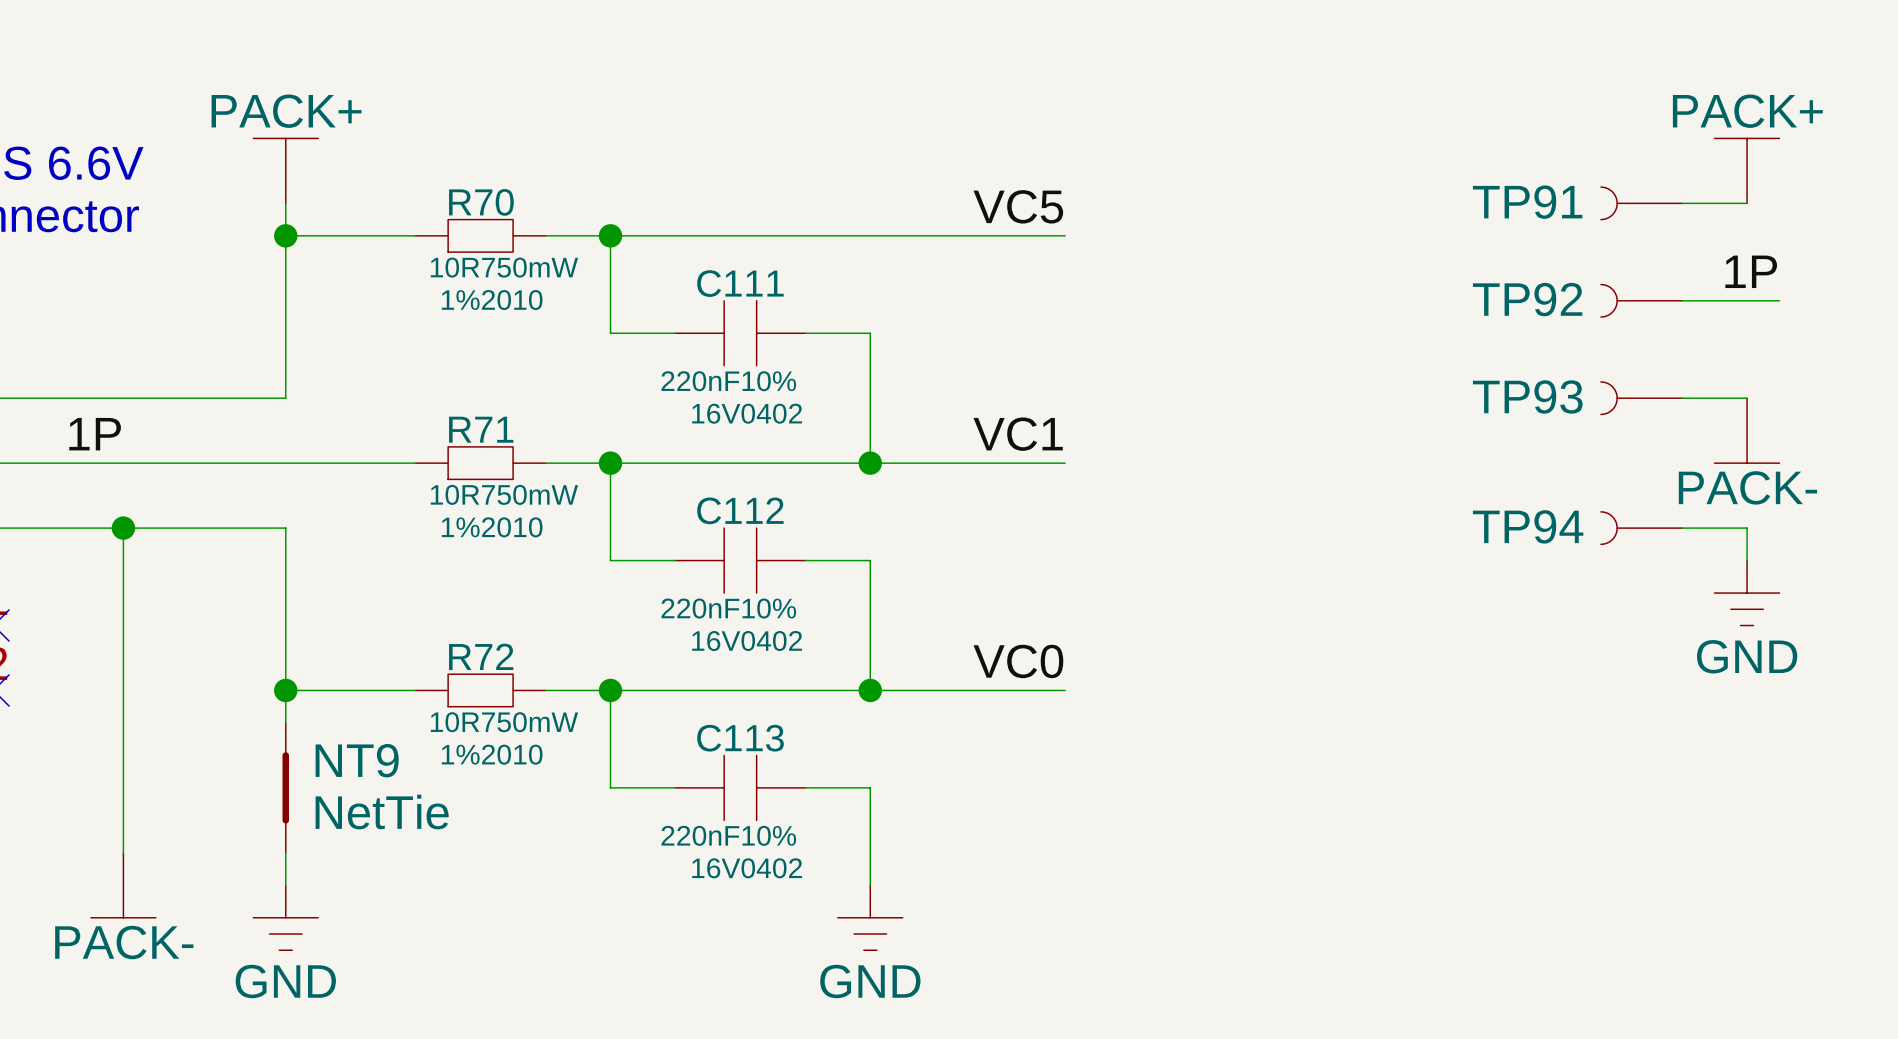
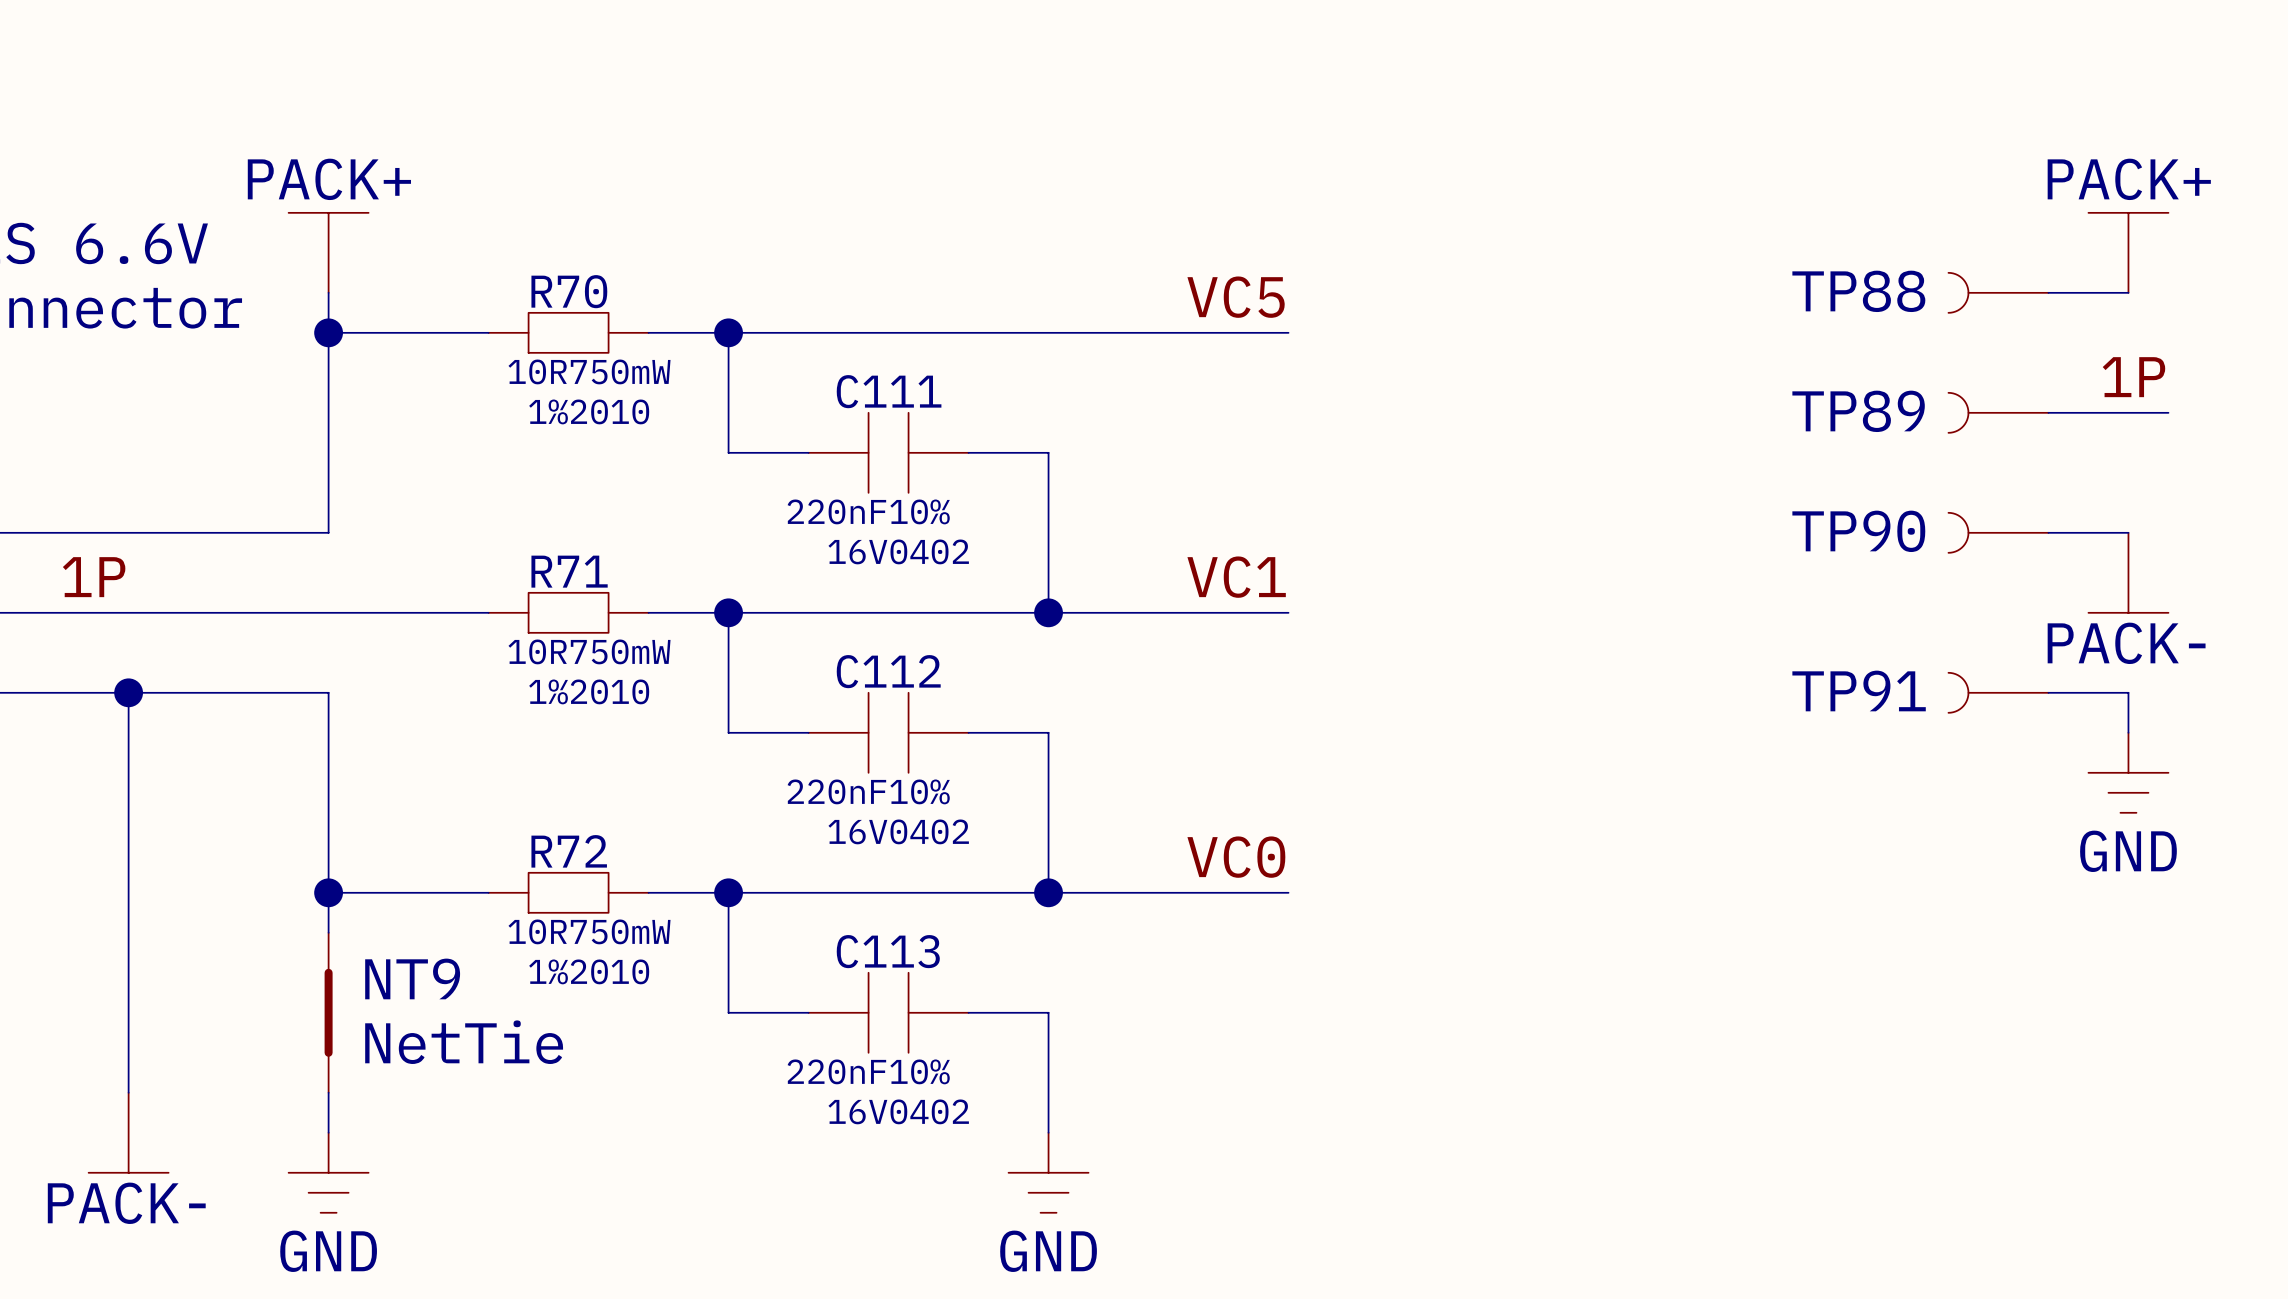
TP91 name: TP91 (1527, 202) -> TP88 (1858, 291)
TP92 name: TP92 (1527, 299) -> TP89 (1858, 411)
TP93 name: TP93 (1527, 396) -> TP90 (1858, 531)
TP94 name: TP94 (1528, 526) -> TP91 (1859, 690)

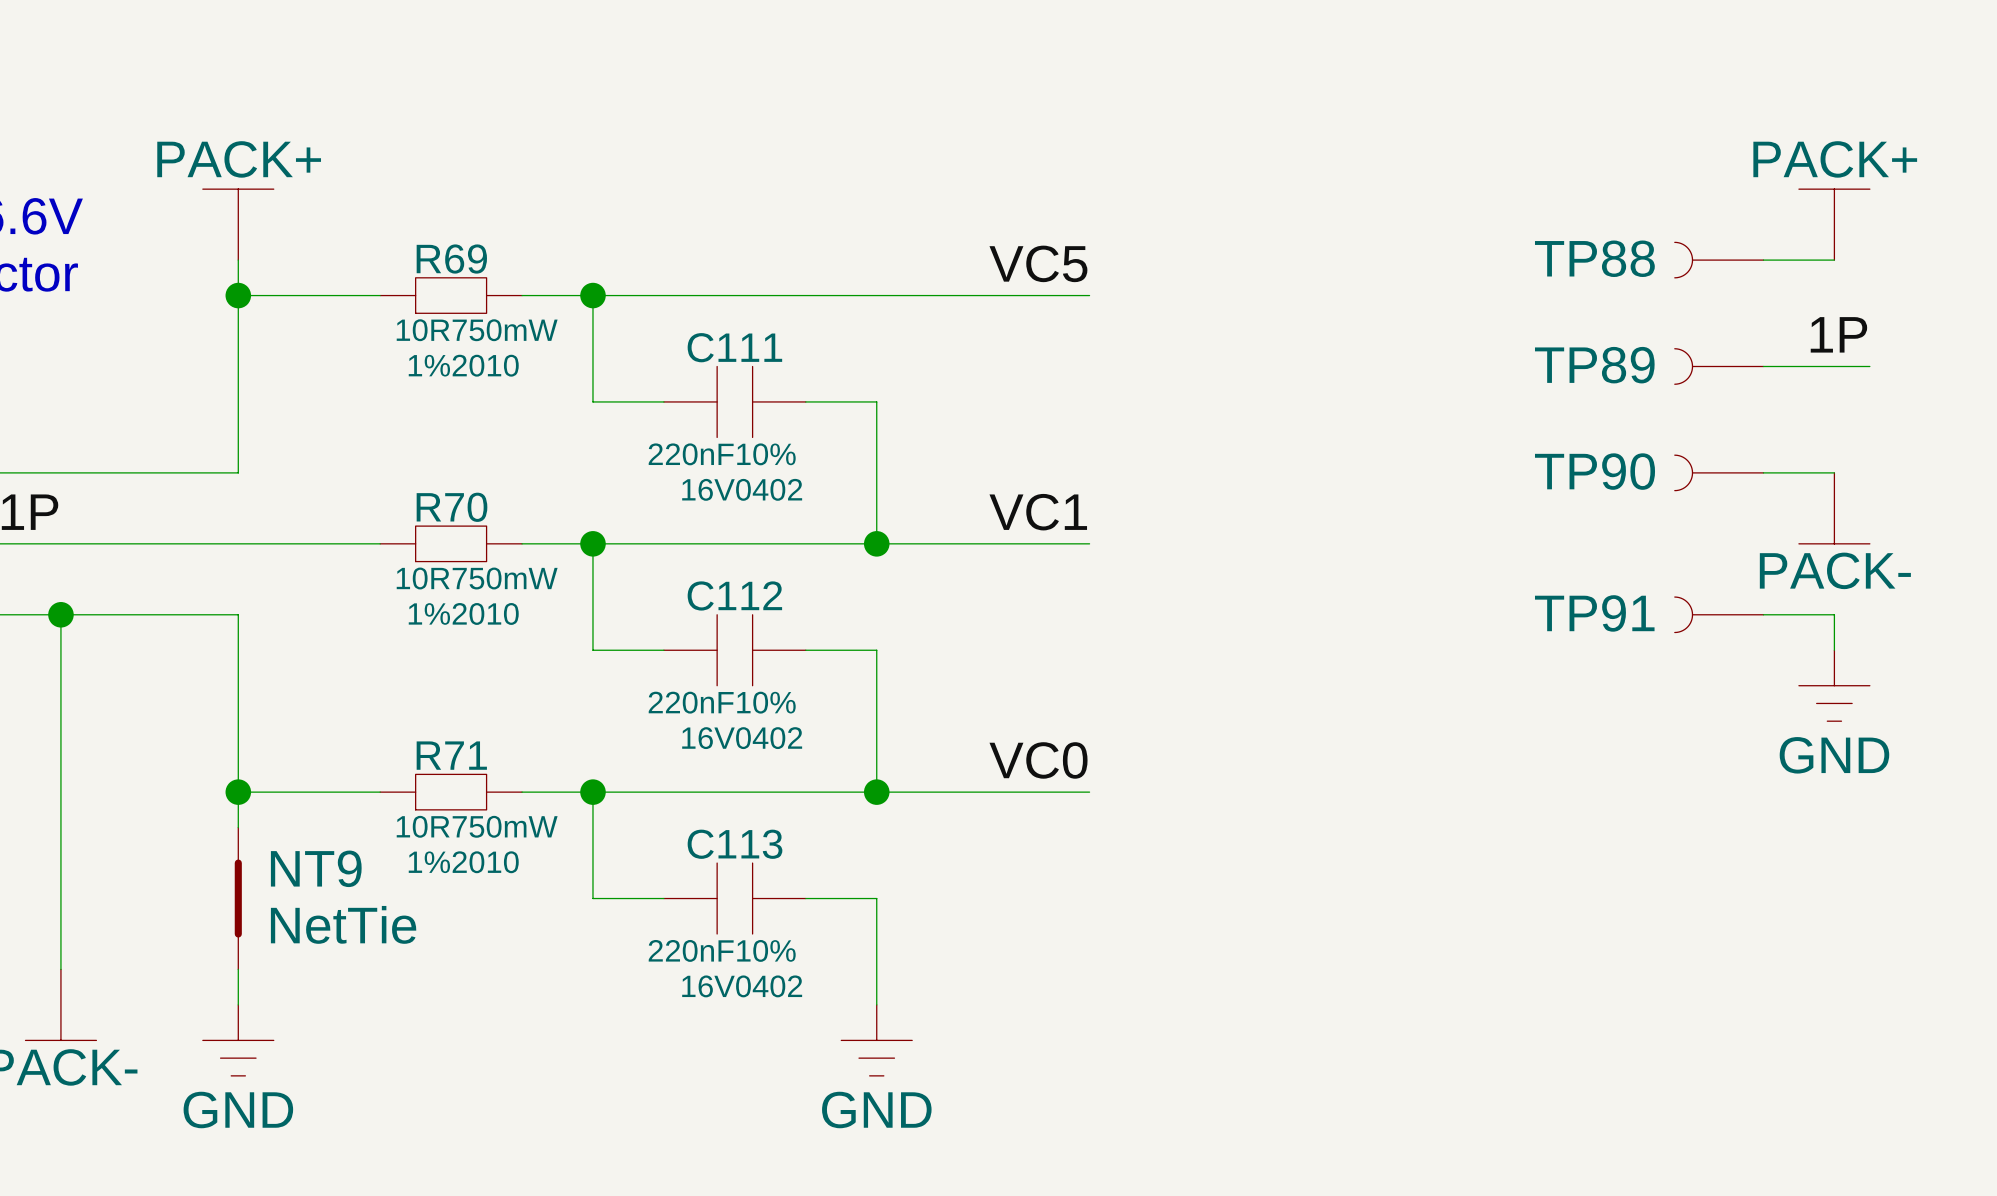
R70 name: R70 (569, 291) -> R69 (451, 259)
R71 name: R71 (569, 571) -> R70 (452, 507)
R72 name: R72 (569, 851) -> R71 (451, 755)

